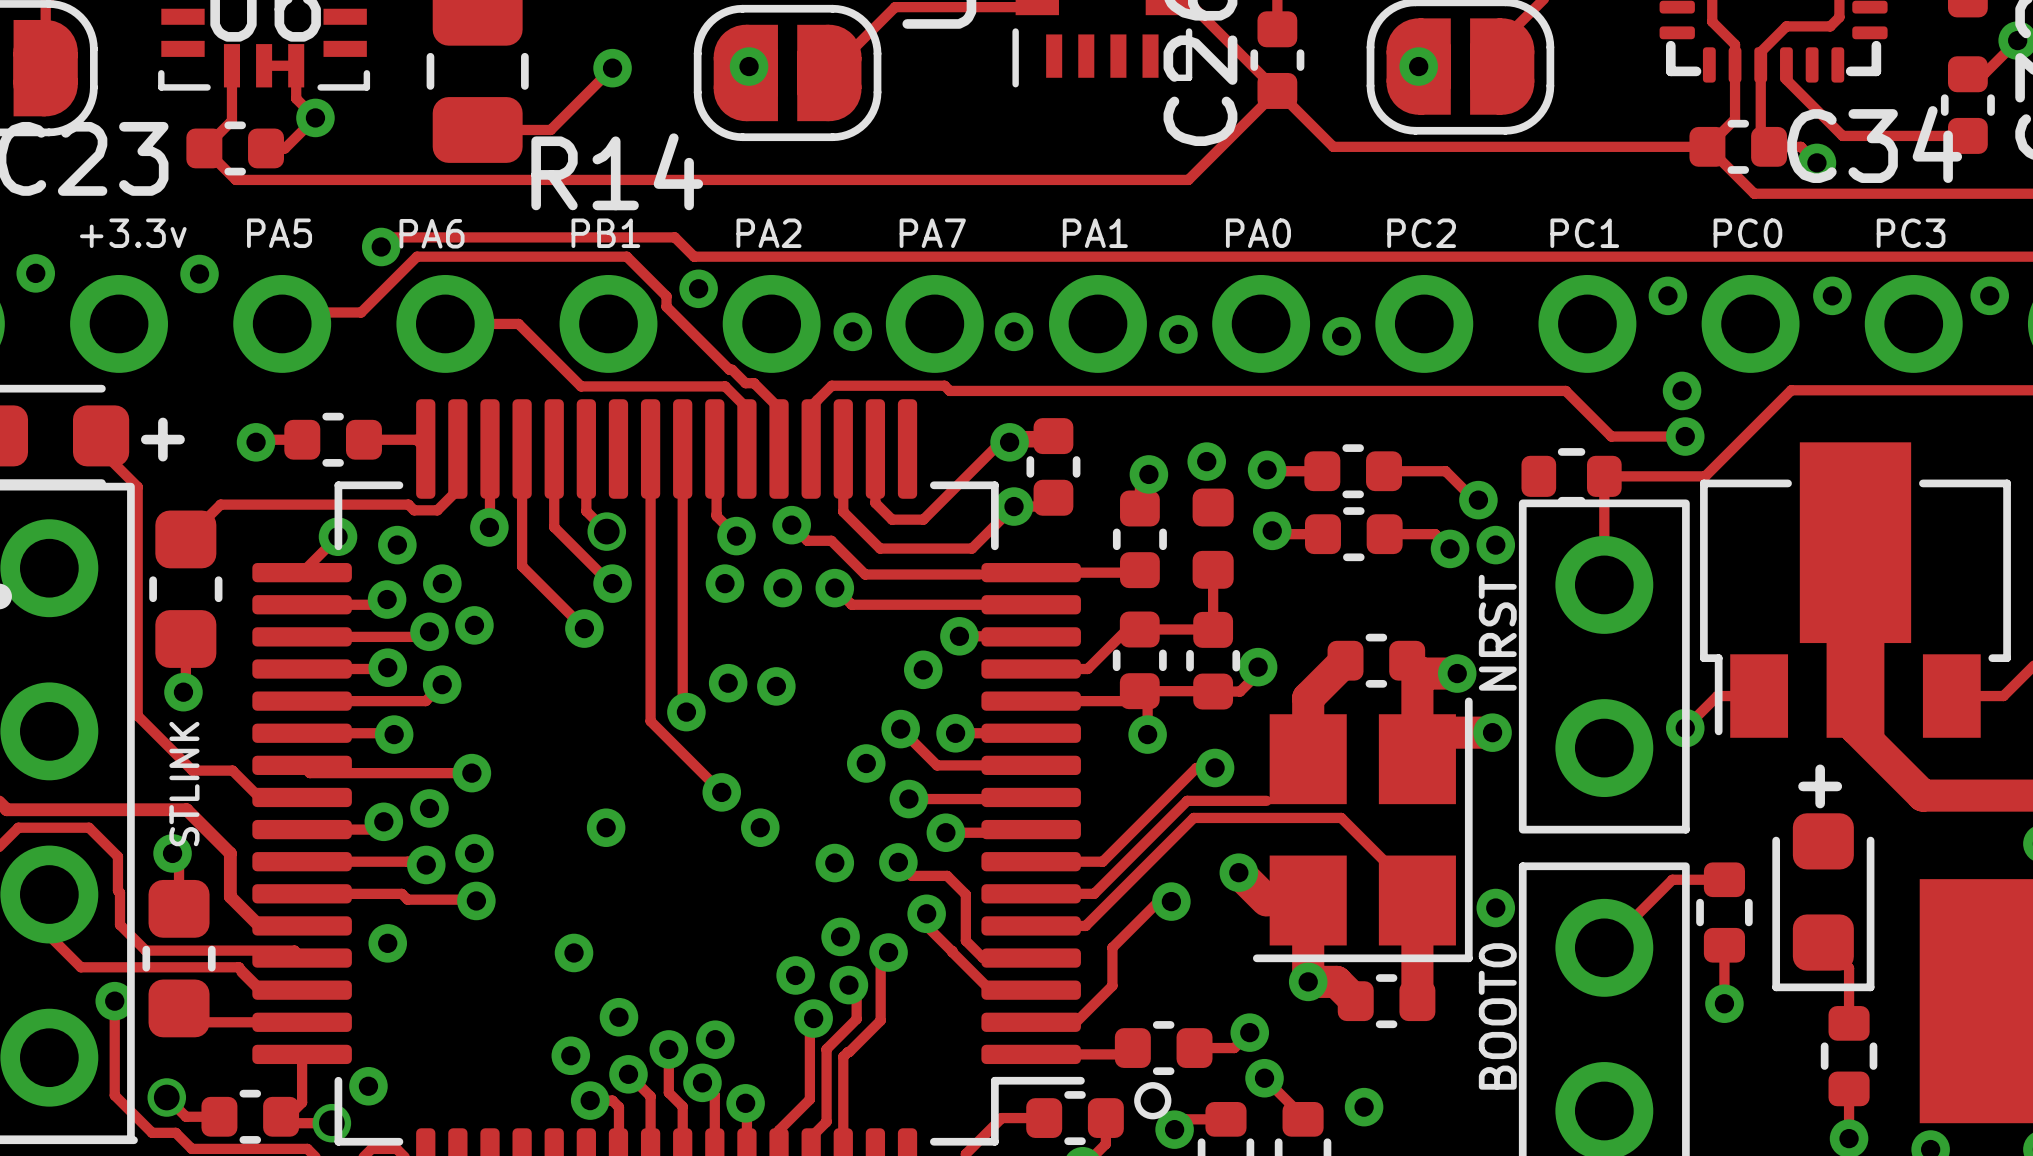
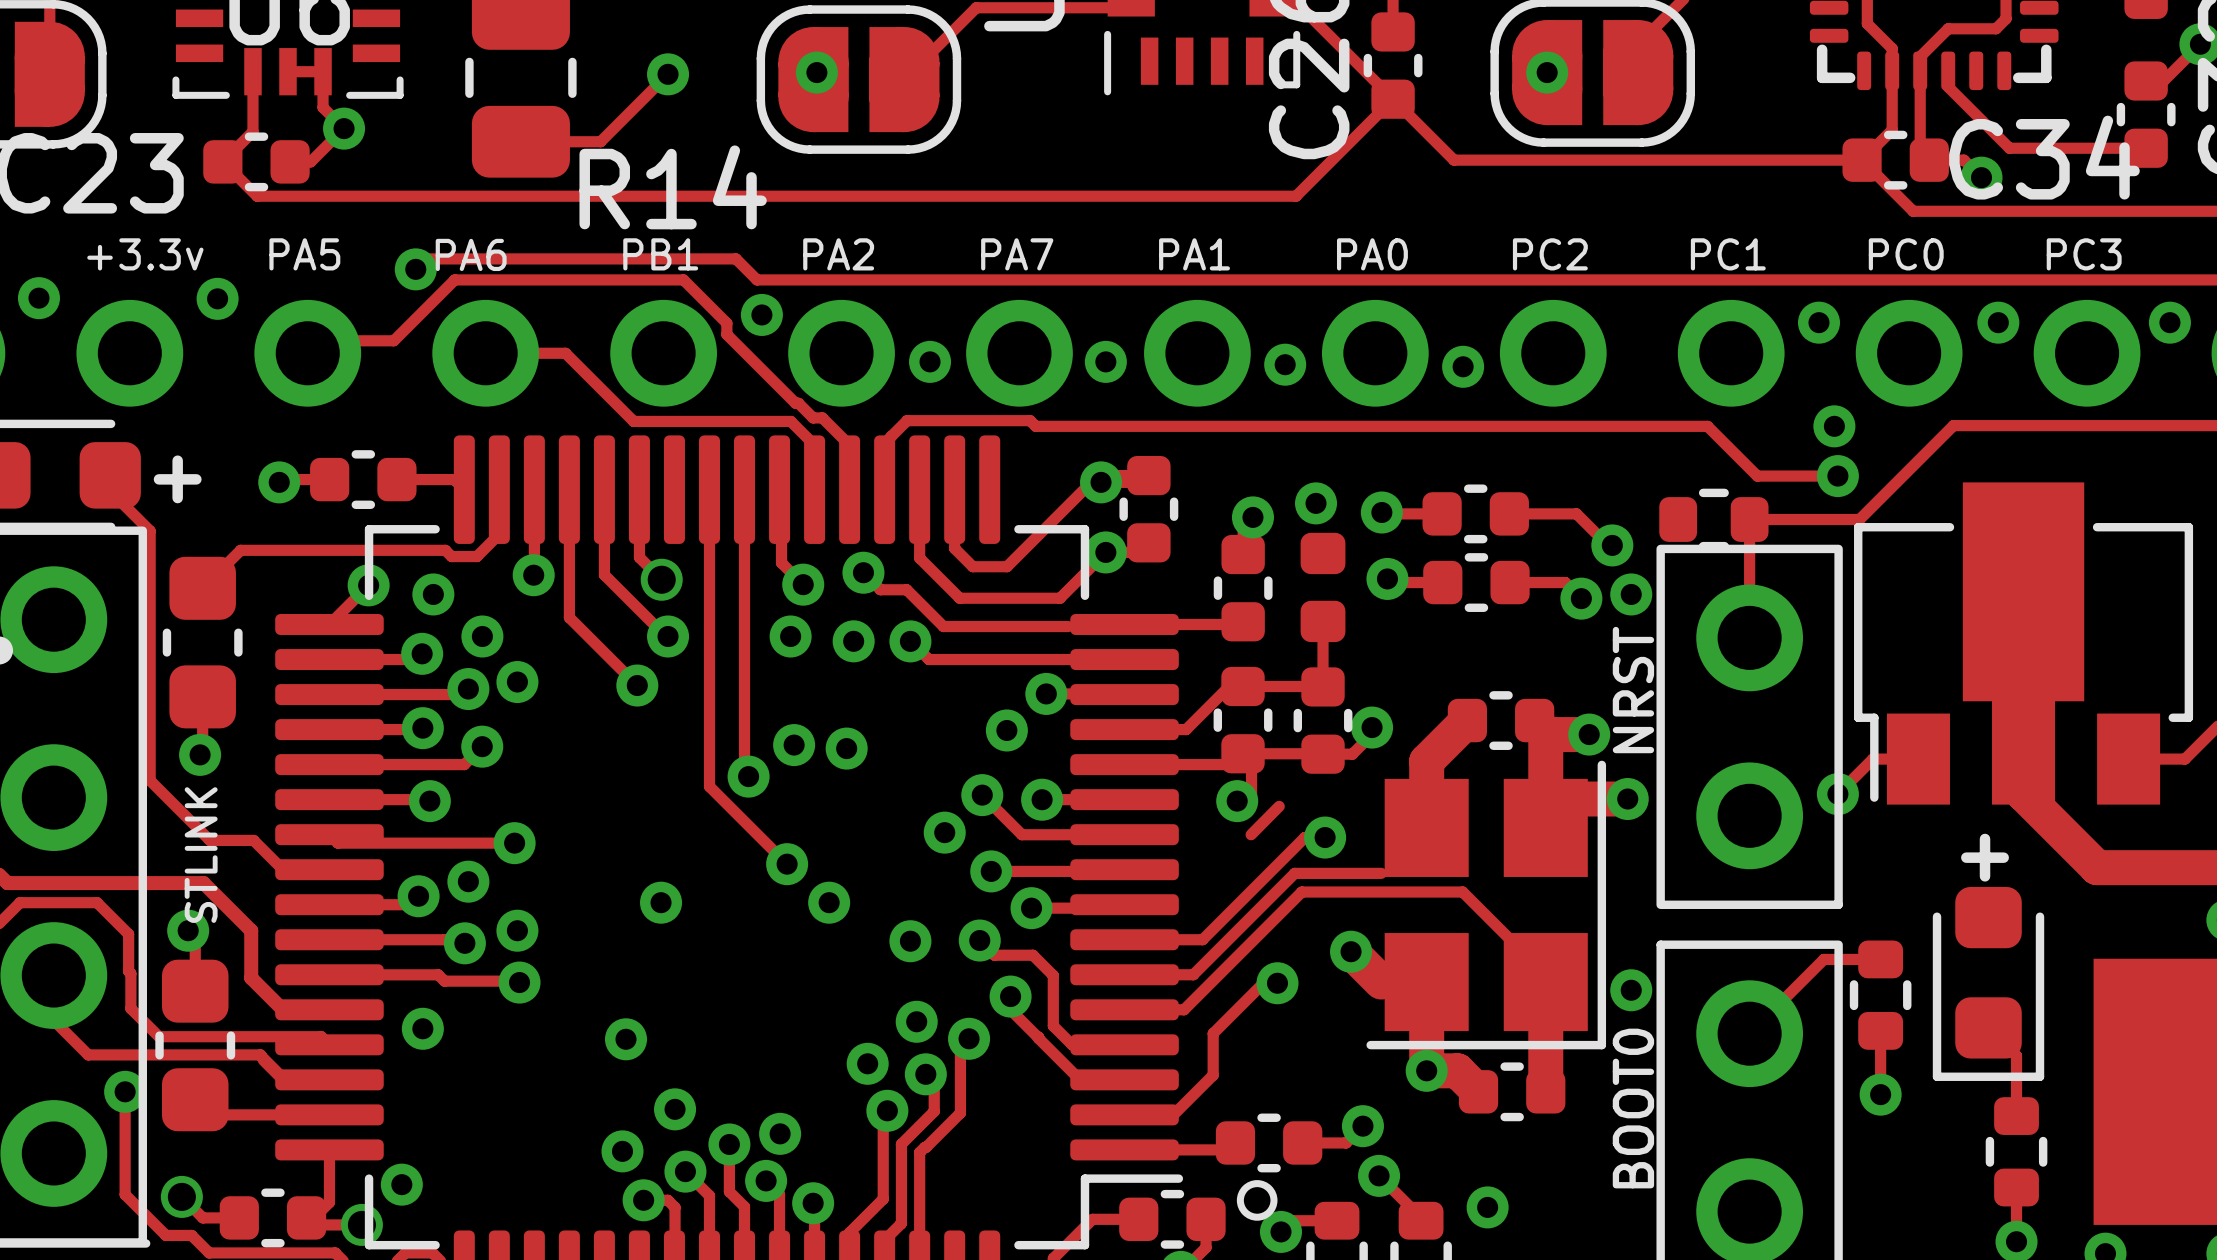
via position: (1147, 734) -> (1237, 801)
track: none -> (1279, 806) (1251, 834)

